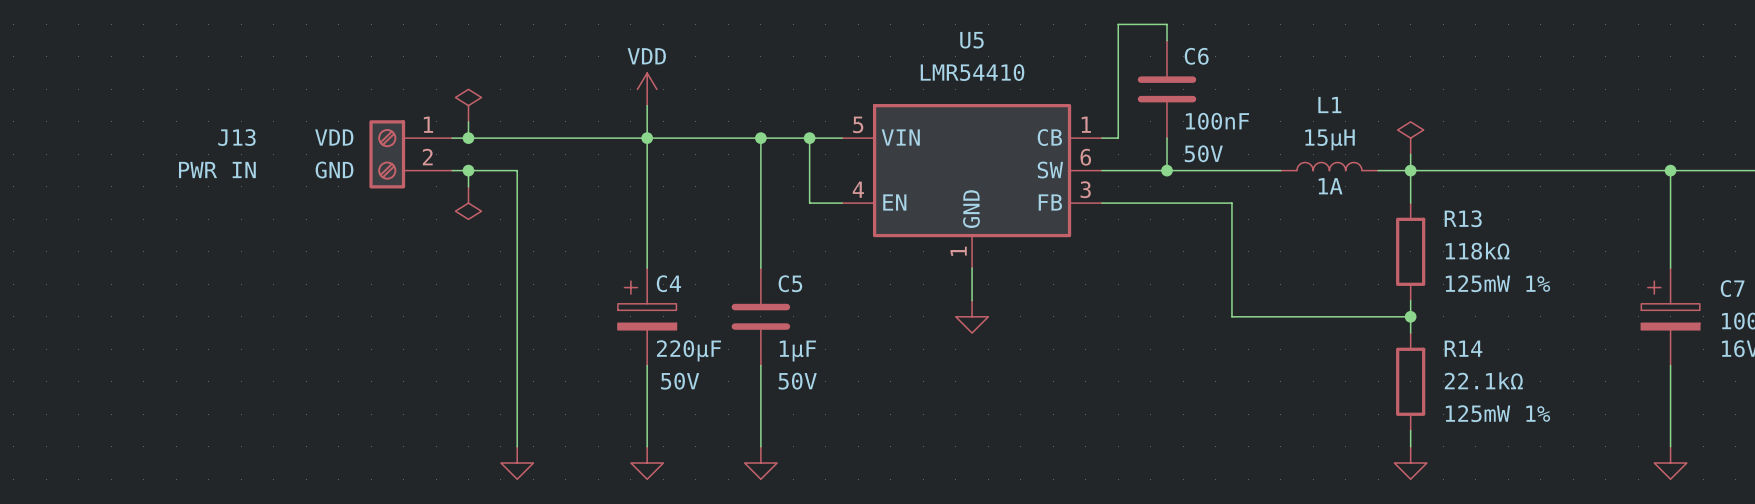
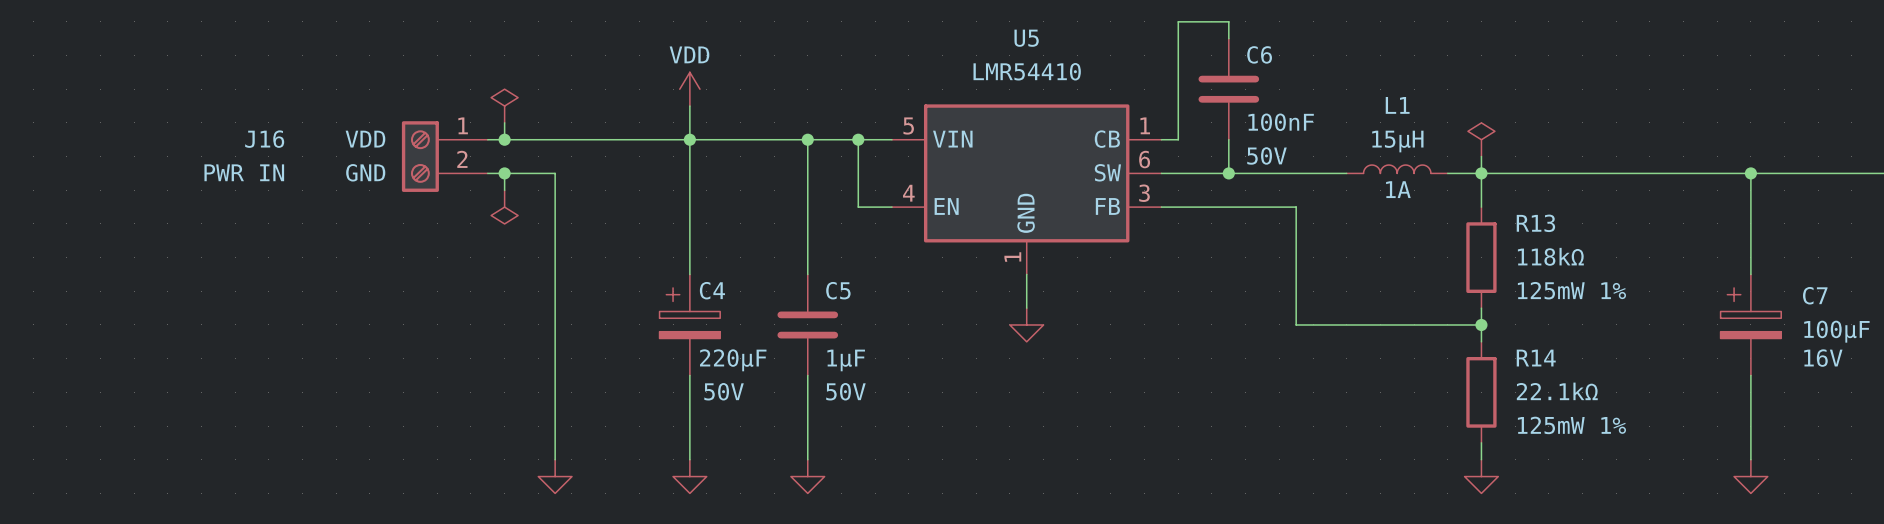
J13 name: J13 (236, 137) -> J16 (264, 139)

